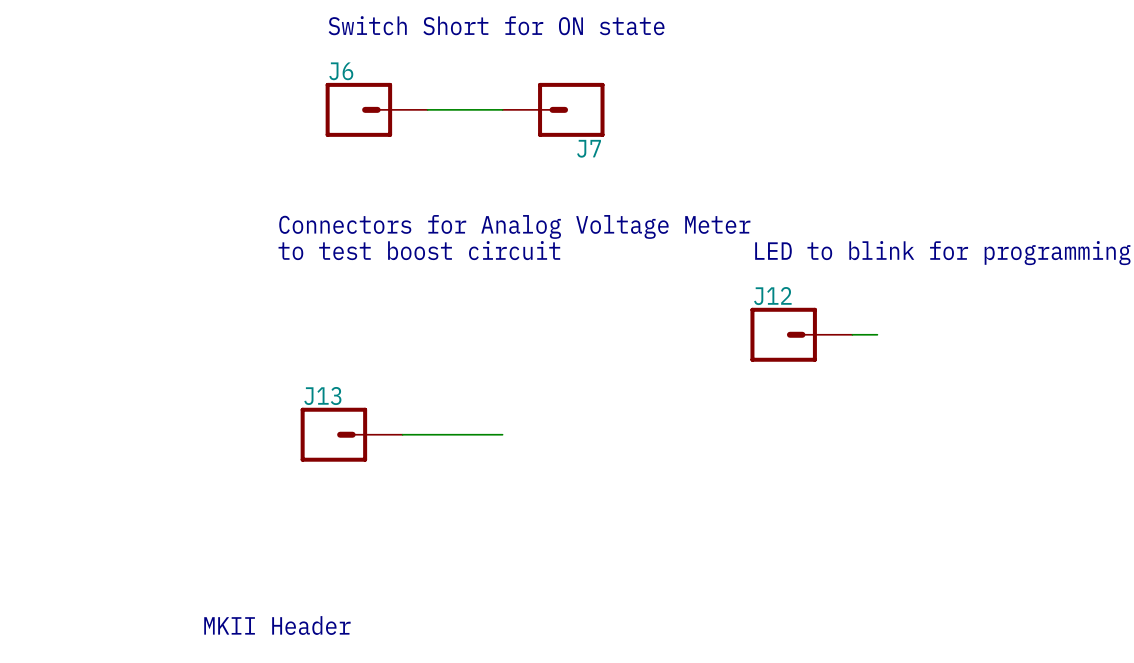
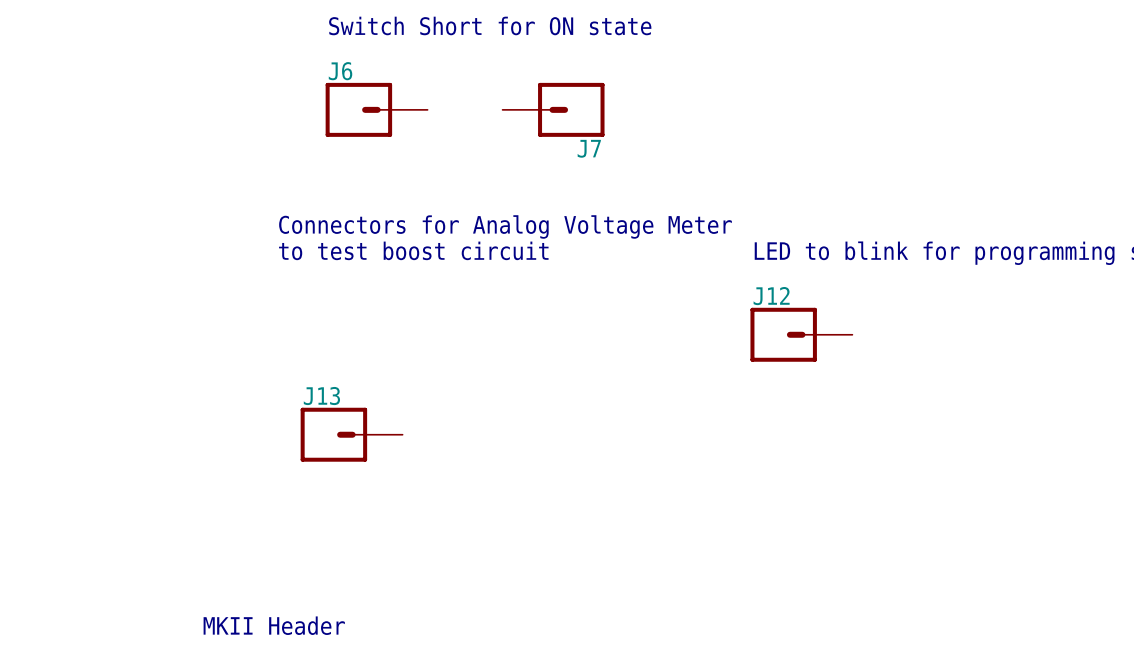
wire: (427, 109) (502, 109) -> none
wire: (852, 334) (877, 334) -> none
wire: (402, 434) (502, 434) -> none

